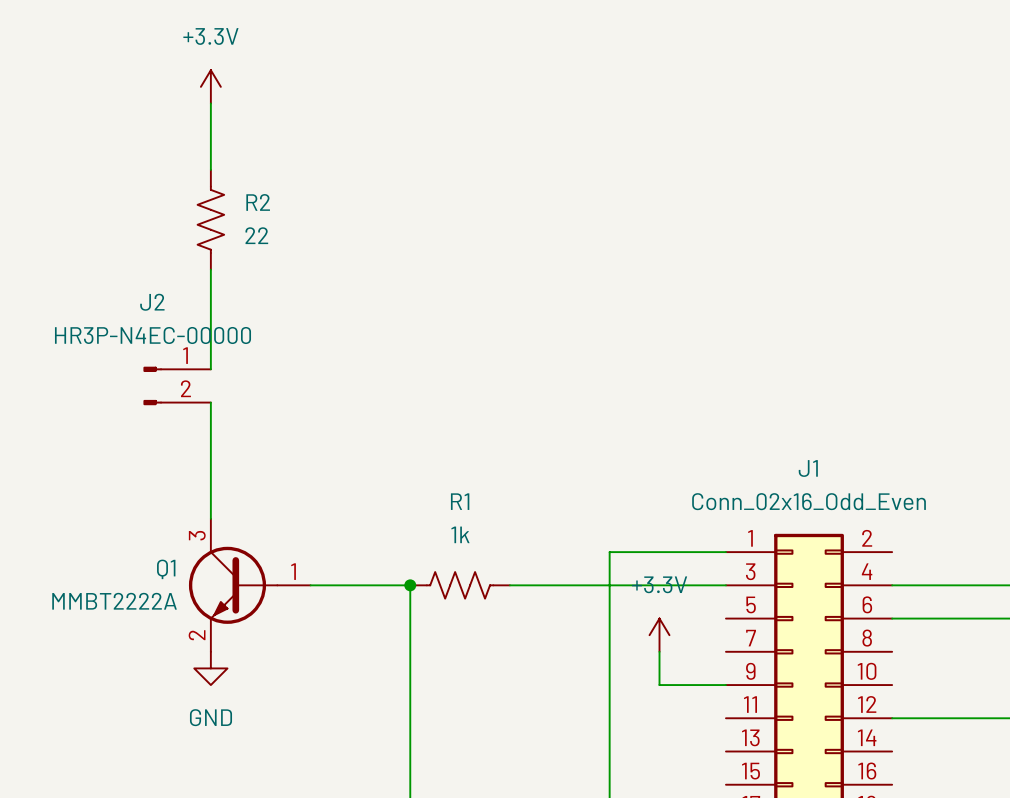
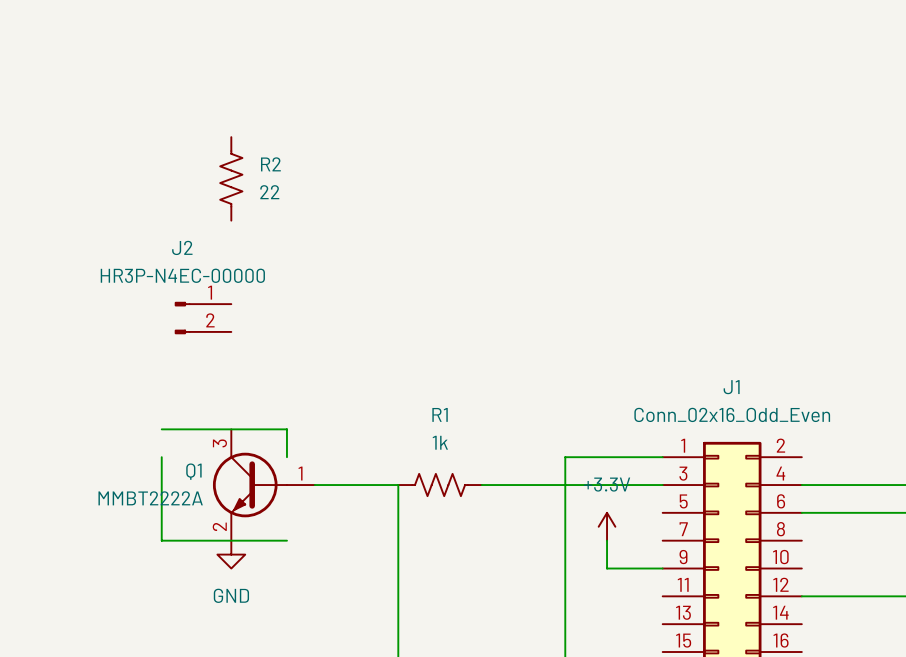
power symbol: +3.3V (210, 86) -> none
wire: (210, 103) (210, 169) -> none
wire: (210, 269) (210, 369) -> none
wire: (210, 402) (210, 518) -> none
wire: none -> (161, 429) (286, 429) (286, 457)
wire: none -> (161, 457) (161, 540) (286, 540)
junction: (410, 585) -> none

